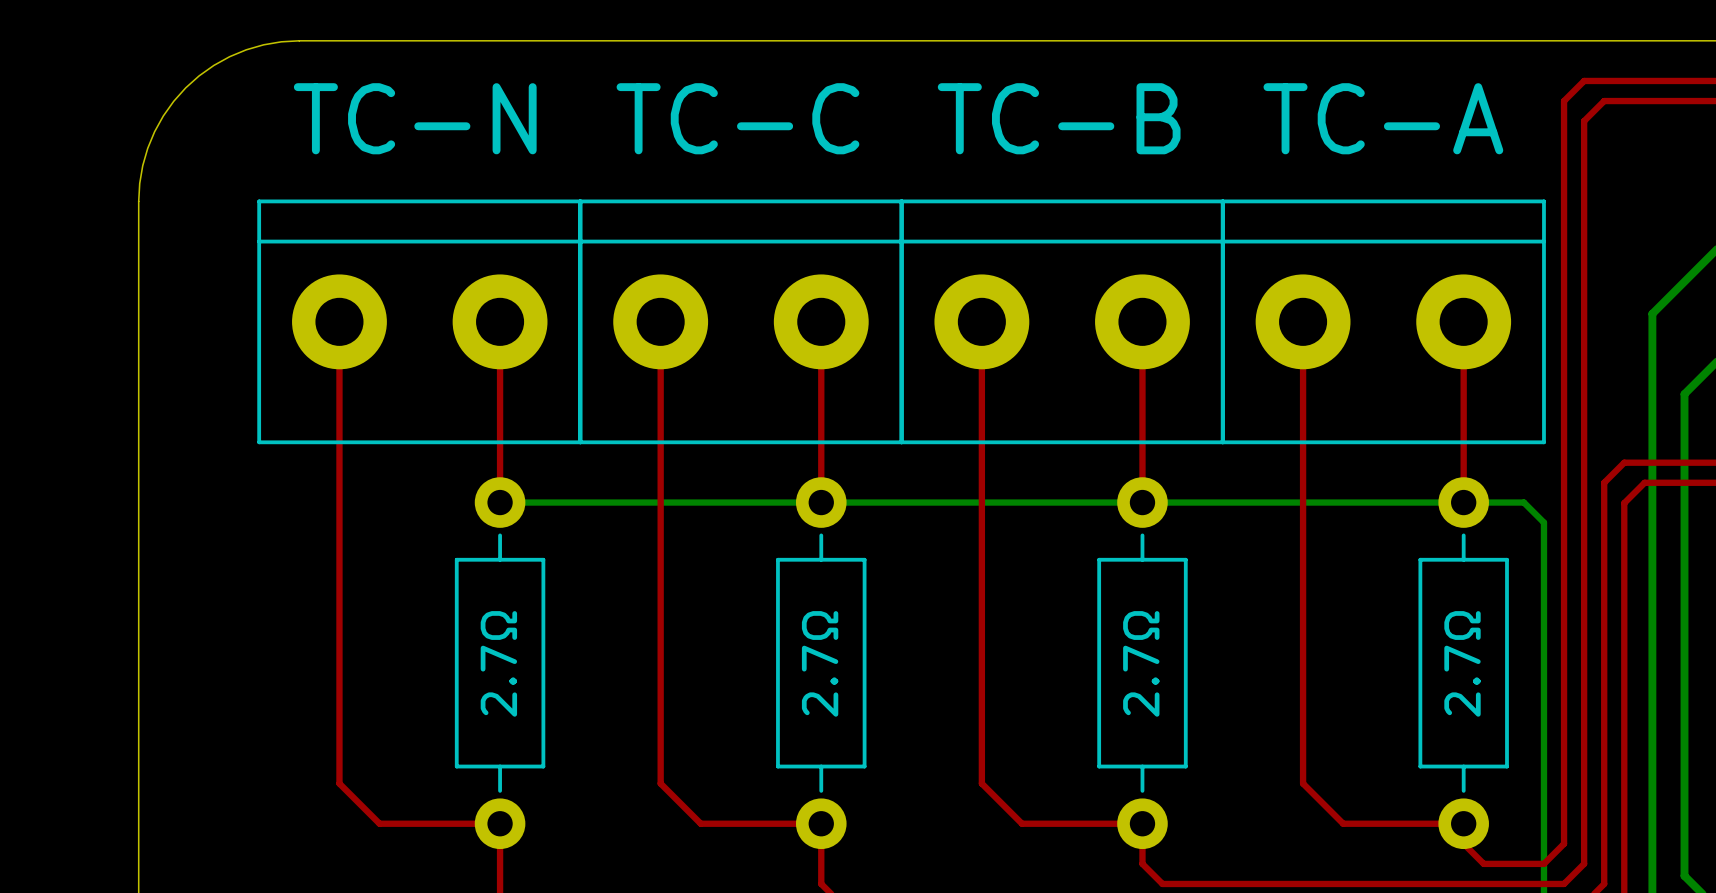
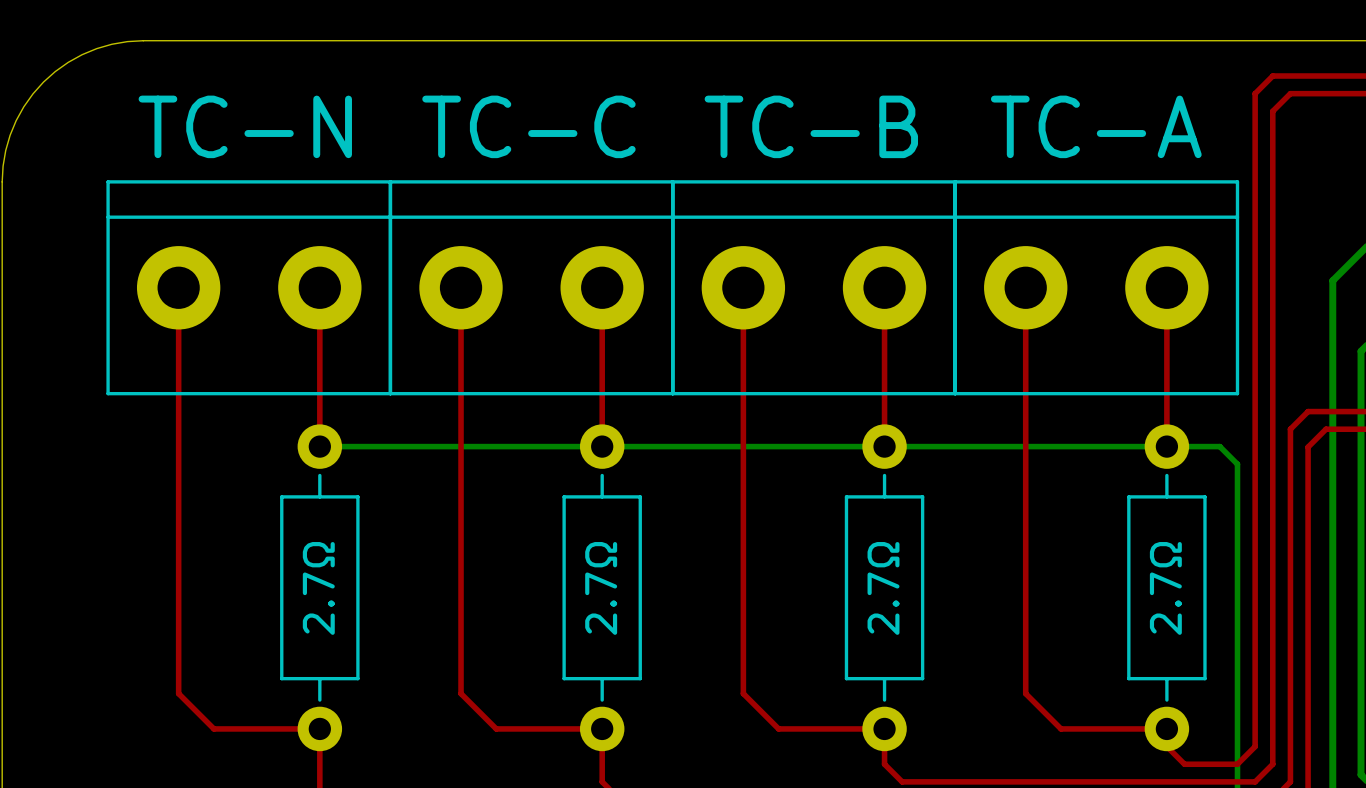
part text position: TC-N (415, 118) -> TC-N (245, 126)
part text position: TC-C (737, 118) -> TC-C (528, 126)
part text position: TC-B (1059, 118) -> TC-B (811, 126)
part text position: TC-A (1383, 118) -> TC-A (1096, 126)

